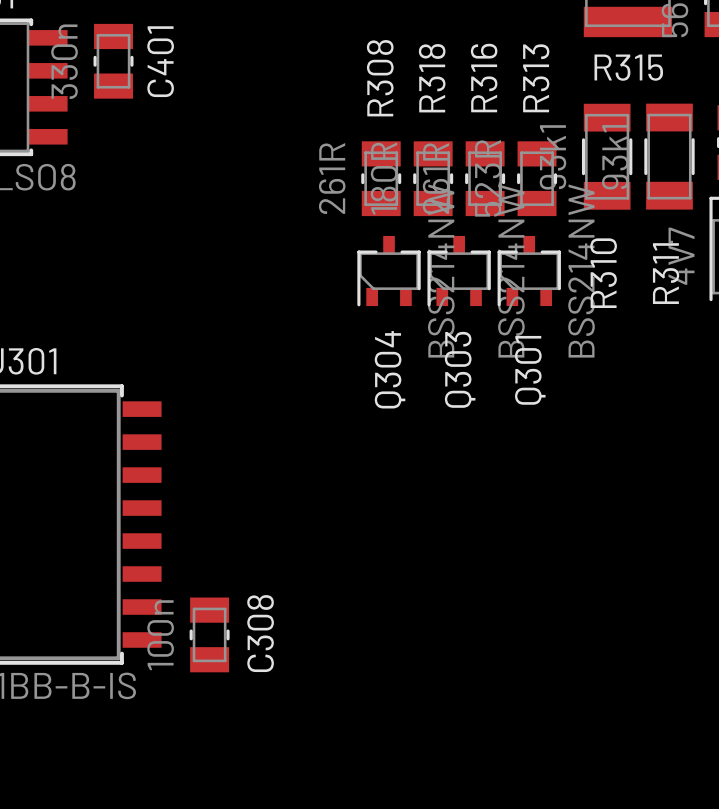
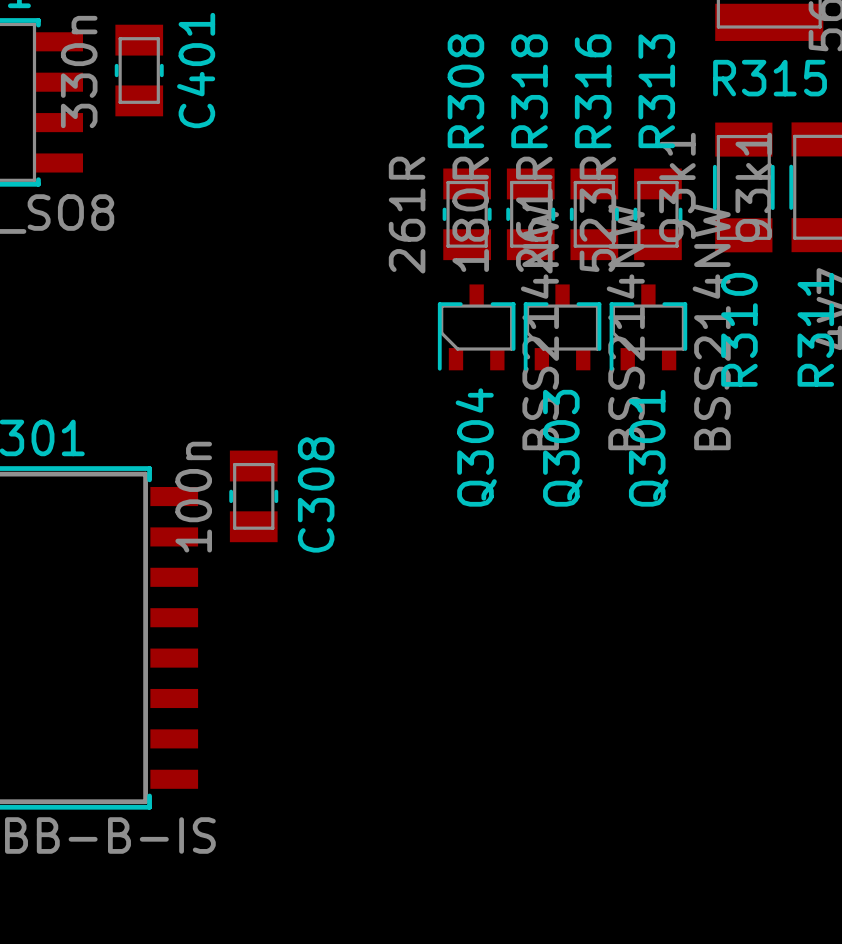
C308 position: (209, 634) -> (253, 496)

